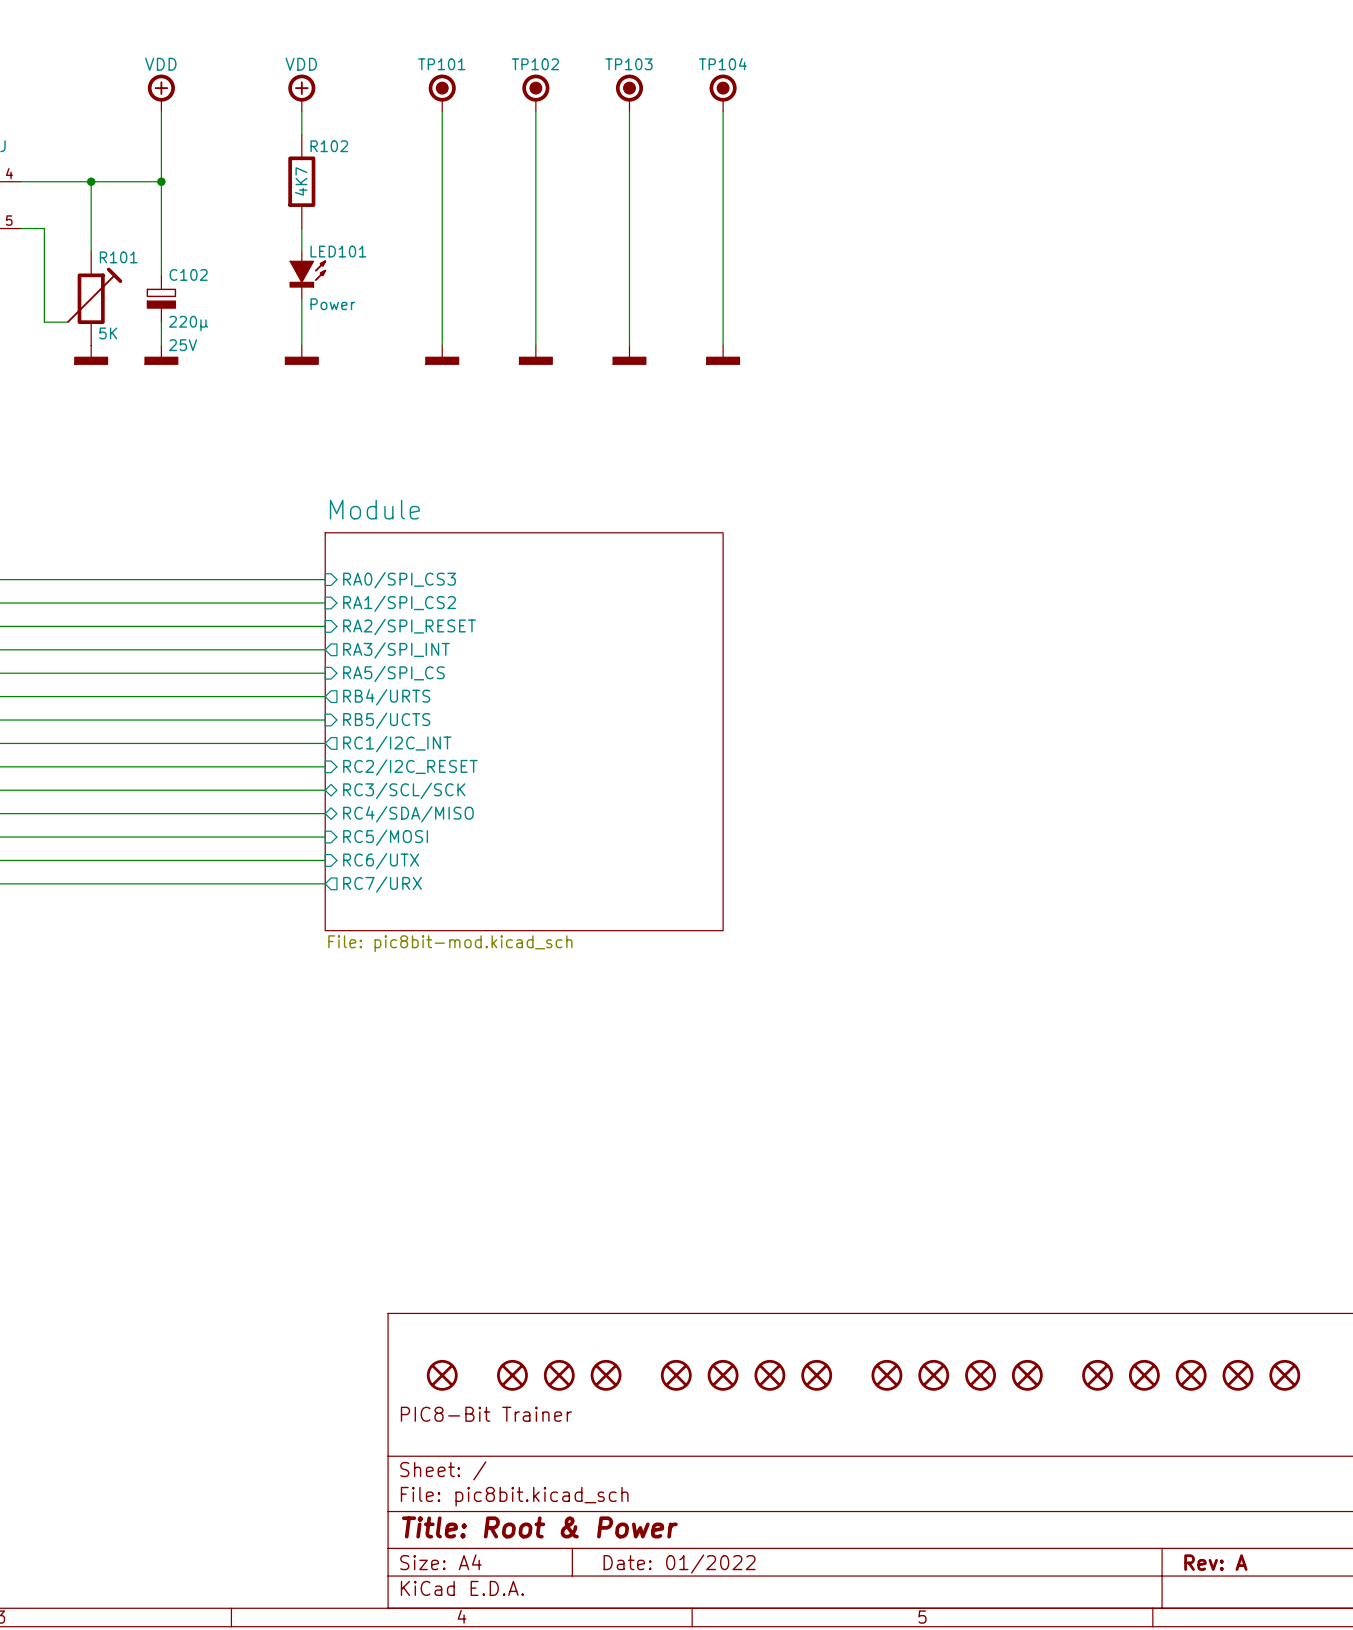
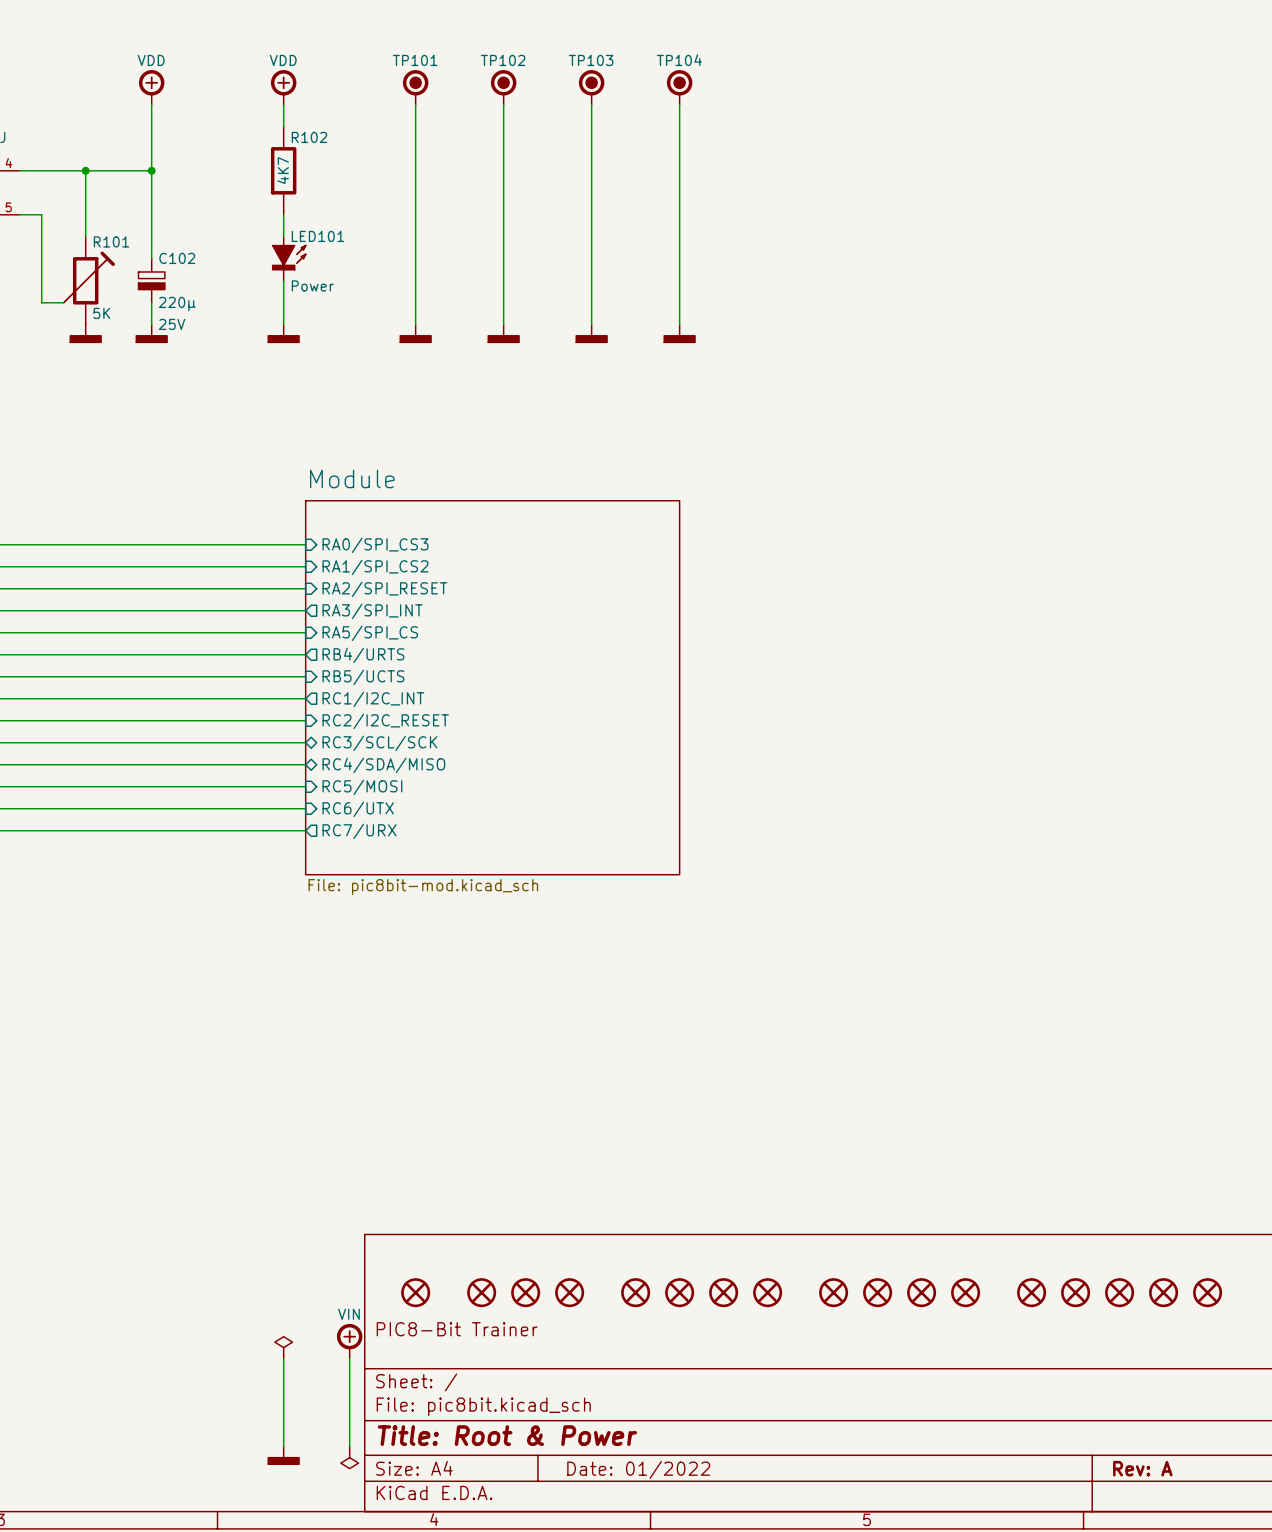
power symbol text: VDD (160, 64) -> none
power symbol text: none -> VDD (151, 60)
power symbol text: VDD (301, 64) -> none
power symbol text: none -> VDD (283, 60)
power symbol: none -> (349, 1341)
power symbol: none -> (283, 1347)
wire: none -> (283, 1358) (283, 1446)
wire: none -> (349, 1358) (349, 1446)
power symbol: none -> (283, 1455)
power symbol: none -> (349, 1457)

